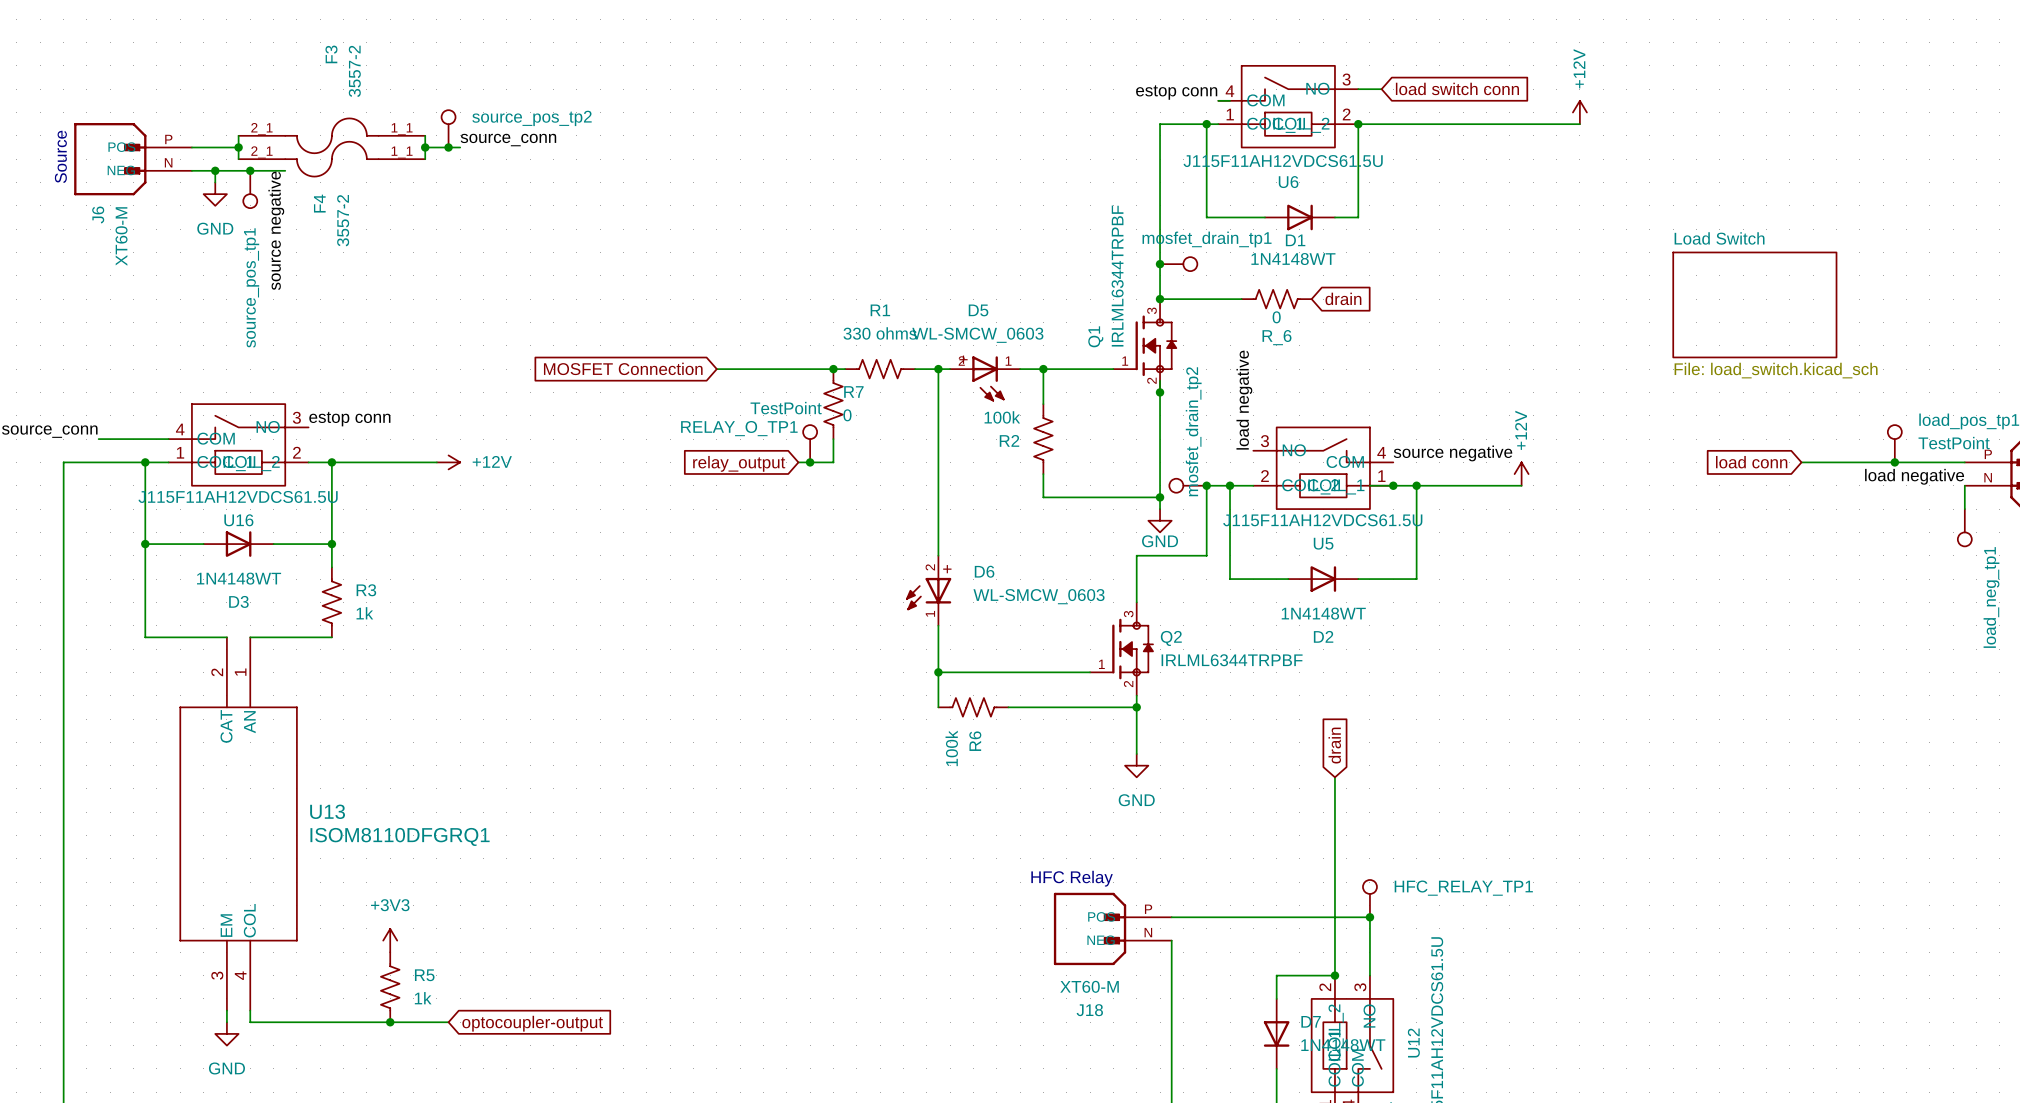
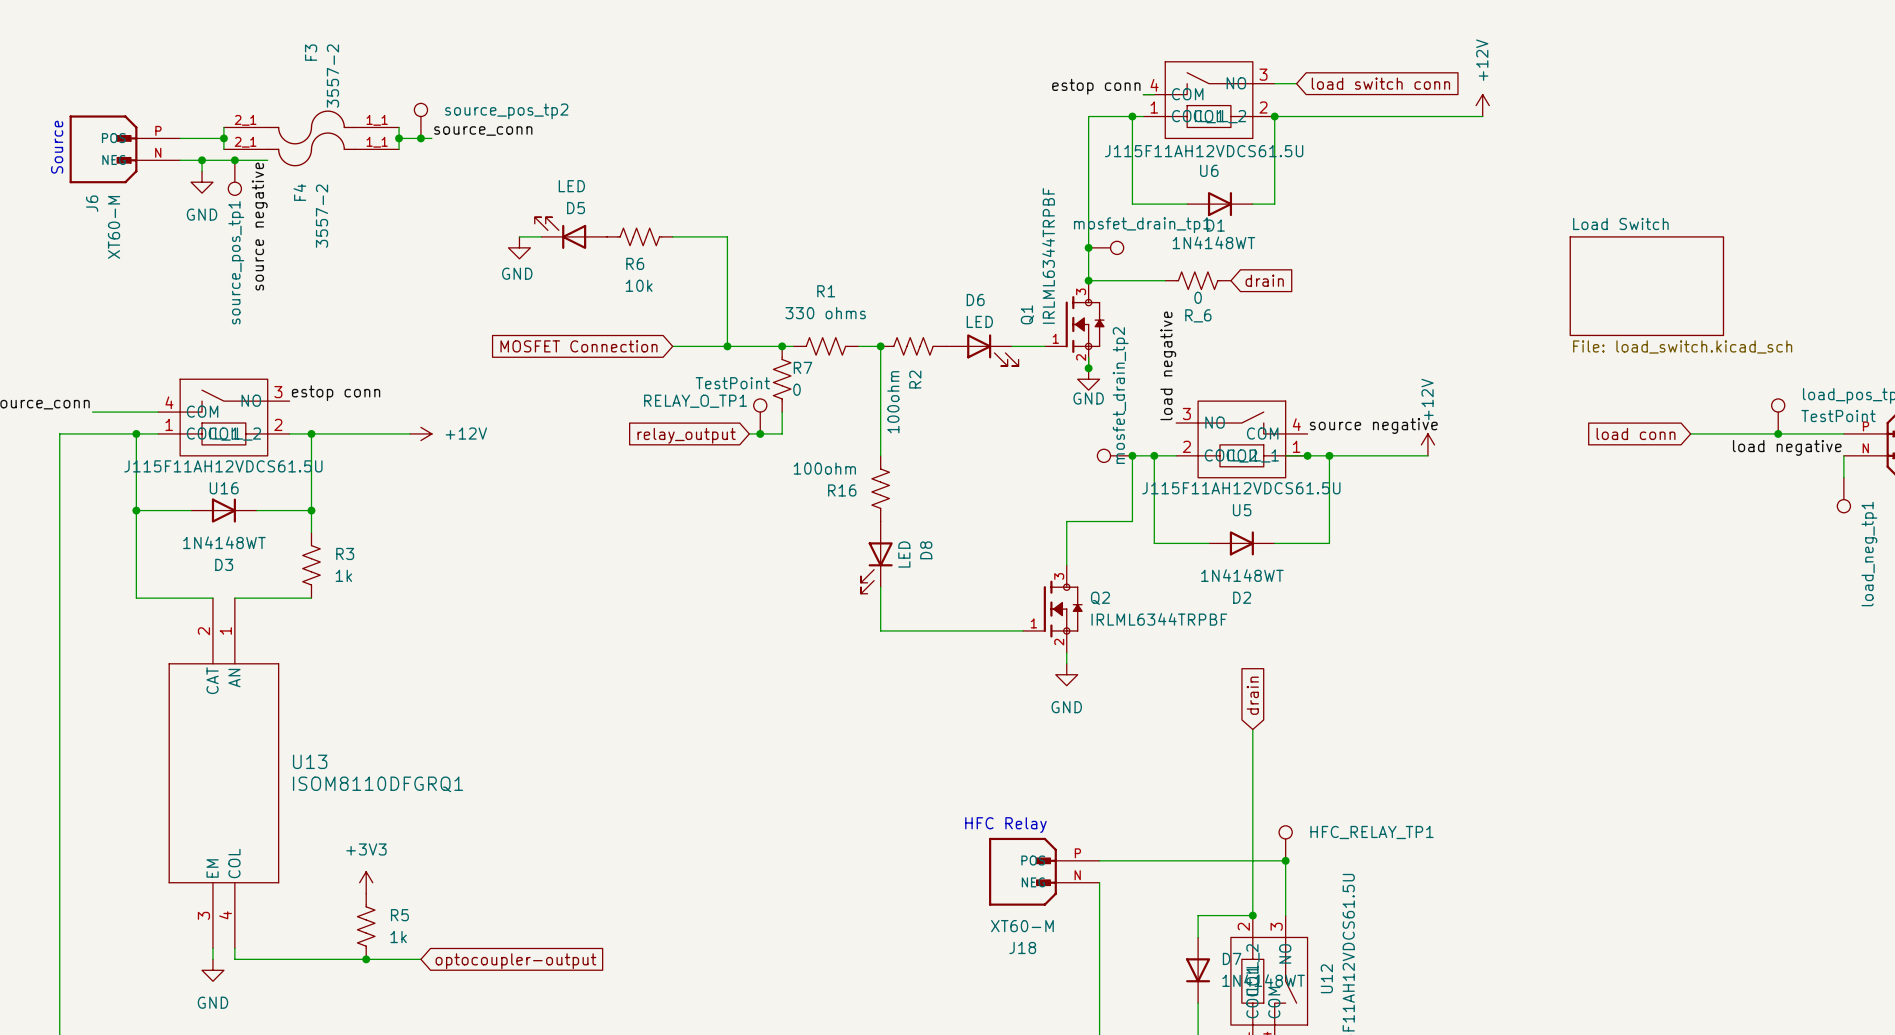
wire: none -> (519, 236) (541, 236)
wire: none -> (672, 236) (727, 236) (727, 346)
power symbol: none -> GND (519, 247)
D5 name position: D5 (978, 310) -> D5 (576, 208)
D5 value: WL-SMCW_0603 (977, 335) -> LED (571, 186)
D5 symbol: [950, 356, 1021, 402] -> [534, 217, 608, 249]
junction: none -> (727, 346)
wire: (1043, 369) (1043, 404) -> none
junction: (1043, 369) -> none
wire: (1160, 392) (1160, 509) -> none
power symbol: none -> GND (1088, 379)
R2 value: 100k (1002, 417) -> 100ohm (893, 402)
R2 rotation: 0° (1043, 439) -> 90° clockwise (913, 346)
R2 position: (1043, 439) -> (913, 346)
R2 name position: R2 (1009, 440) -> R2 (915, 379)
wire: (1043, 474) (1043, 497) (1160, 497) -> none
junction: (1160, 497) -> none
R16: none -> 100ohm (880, 488)
power symbol: GND (1160, 520) -> none
D6 symbol: [906, 555, 952, 626] -> [946, 334, 1019, 367]
D6 name position: D6 (984, 571) -> D6 (975, 300)
D8: none -> LED (876, 557)
D6 value: WL-SMCW_0603 (1039, 596) -> LED (979, 321)
wire: (938, 672) (938, 707) -> none
junction: (938, 672) -> none
R6 position: (973, 707) -> (639, 236)
wire: (1008, 707) (1136, 707) (1136, 754) -> none
junction: (1136, 707) -> none
R6 name rotation: 0° (975, 741) -> 90° clockwise (635, 263)
R6 value: 100k (951, 748) -> 10k (639, 285)
power symbol position: GND (1136, 765) -> GND (1066, 674)

